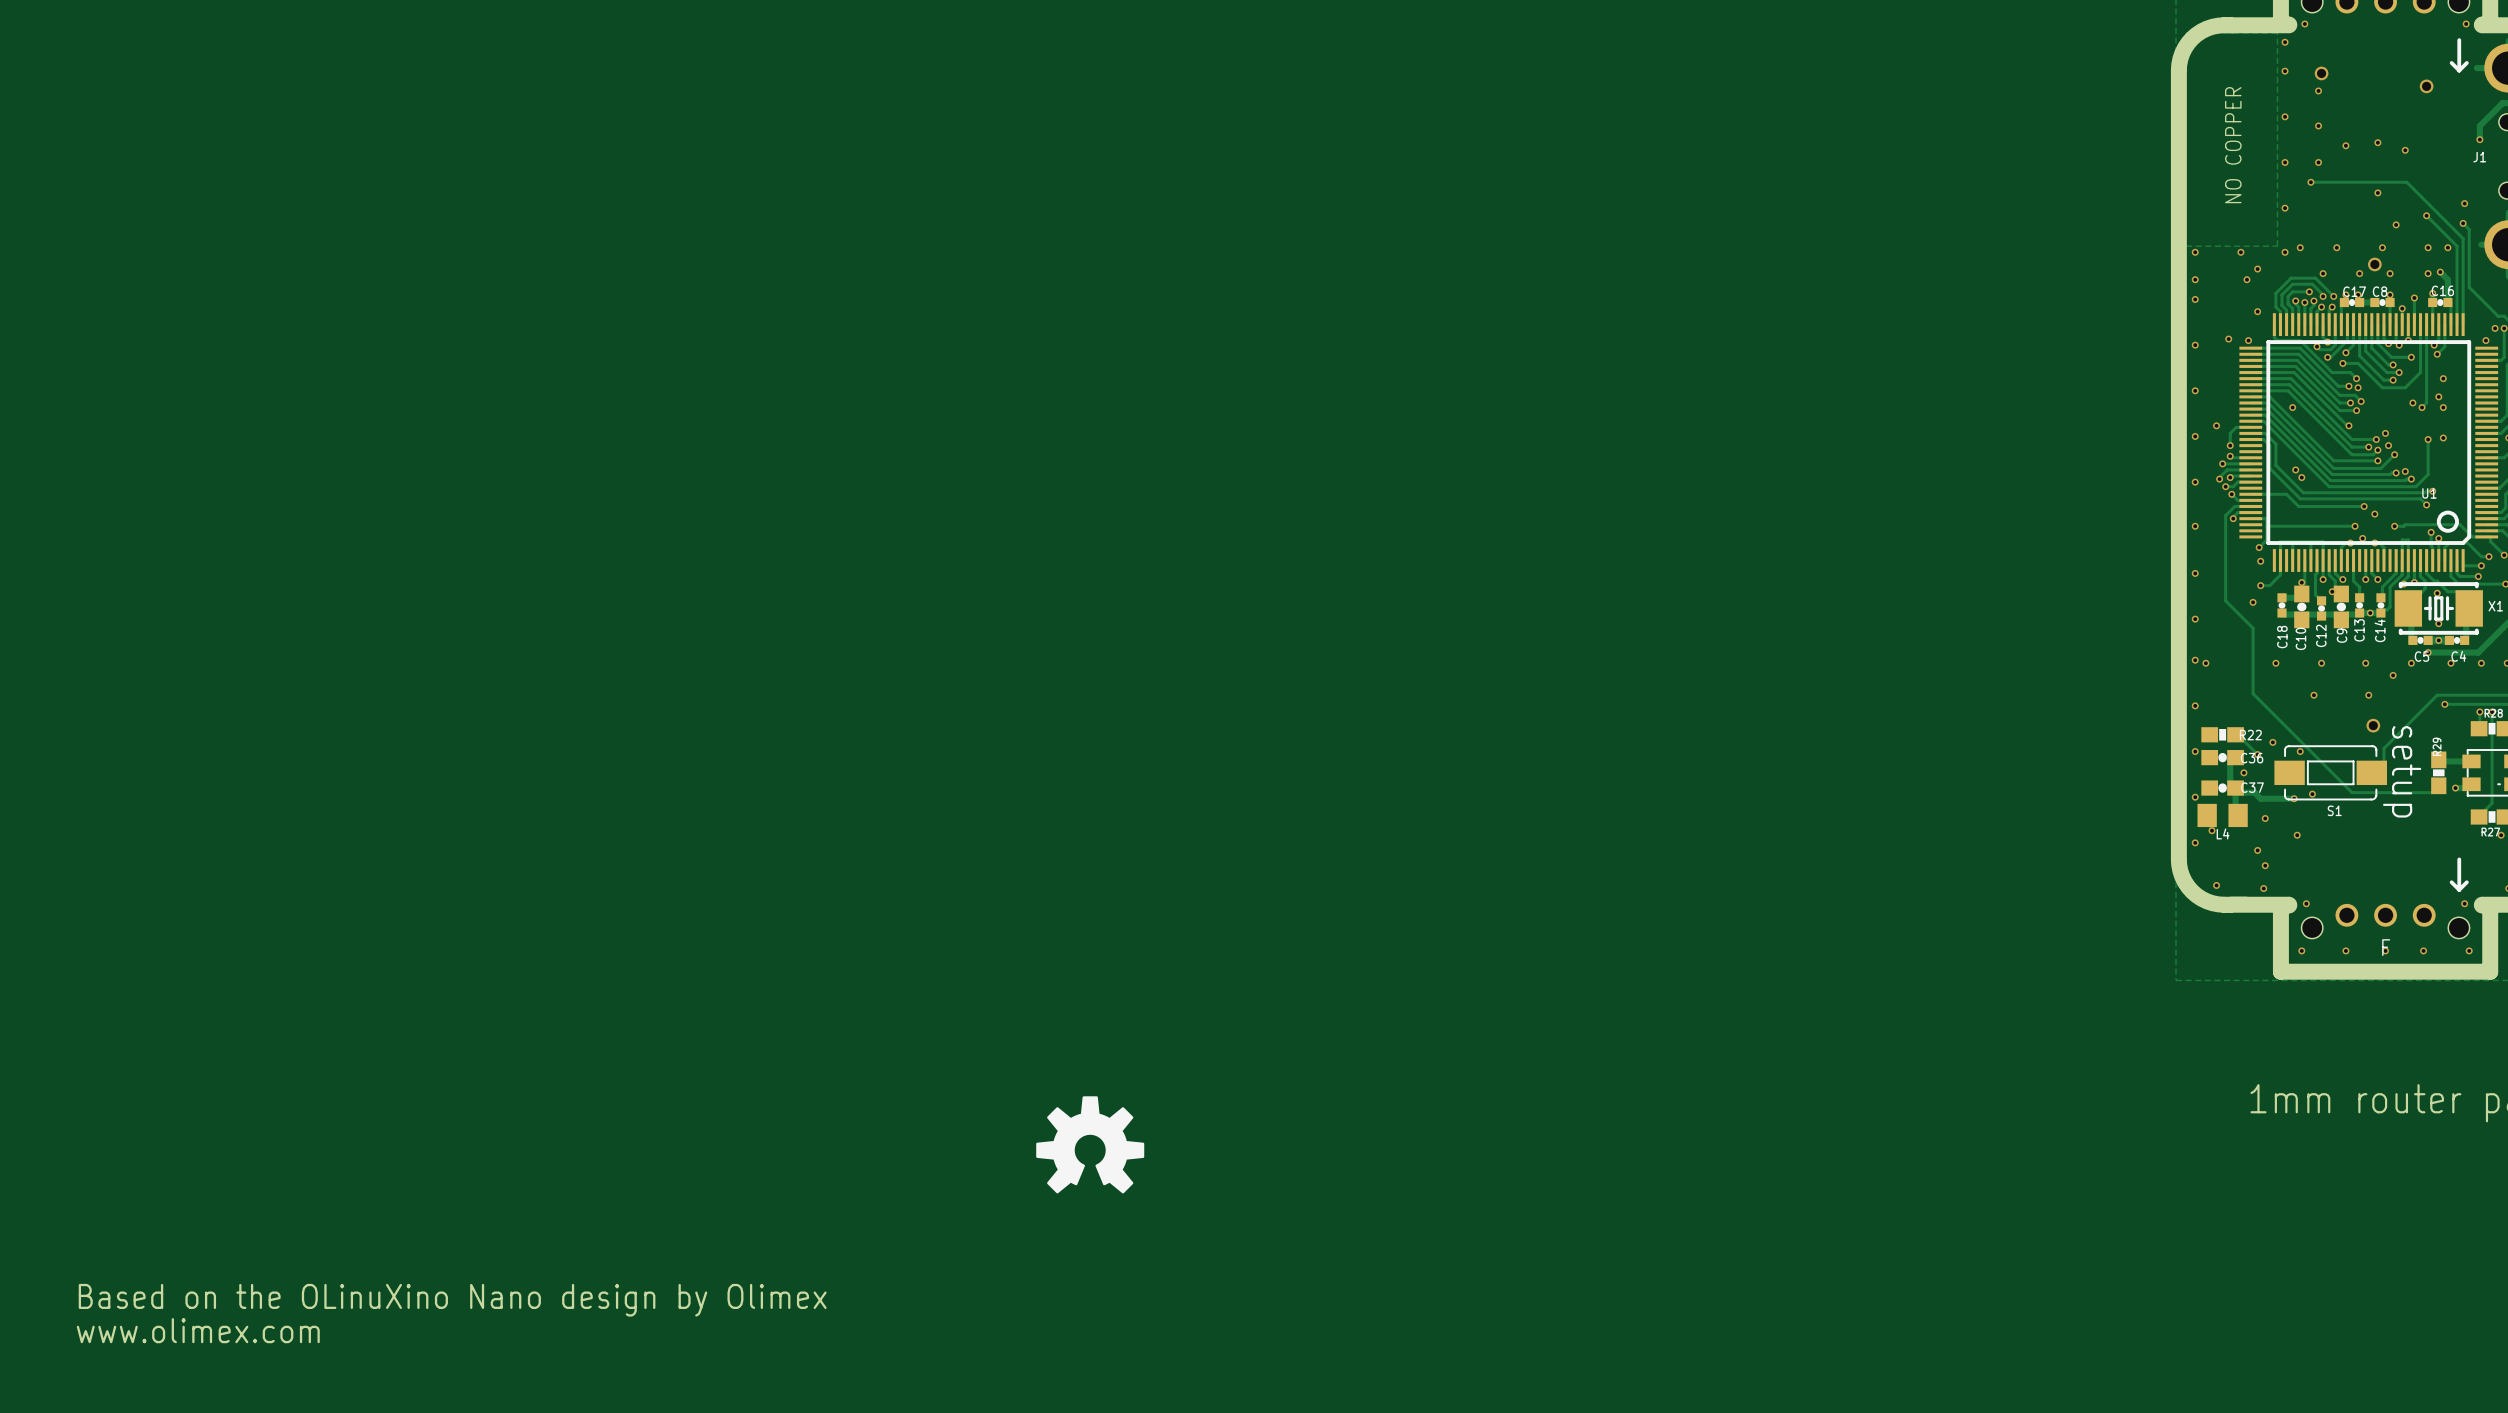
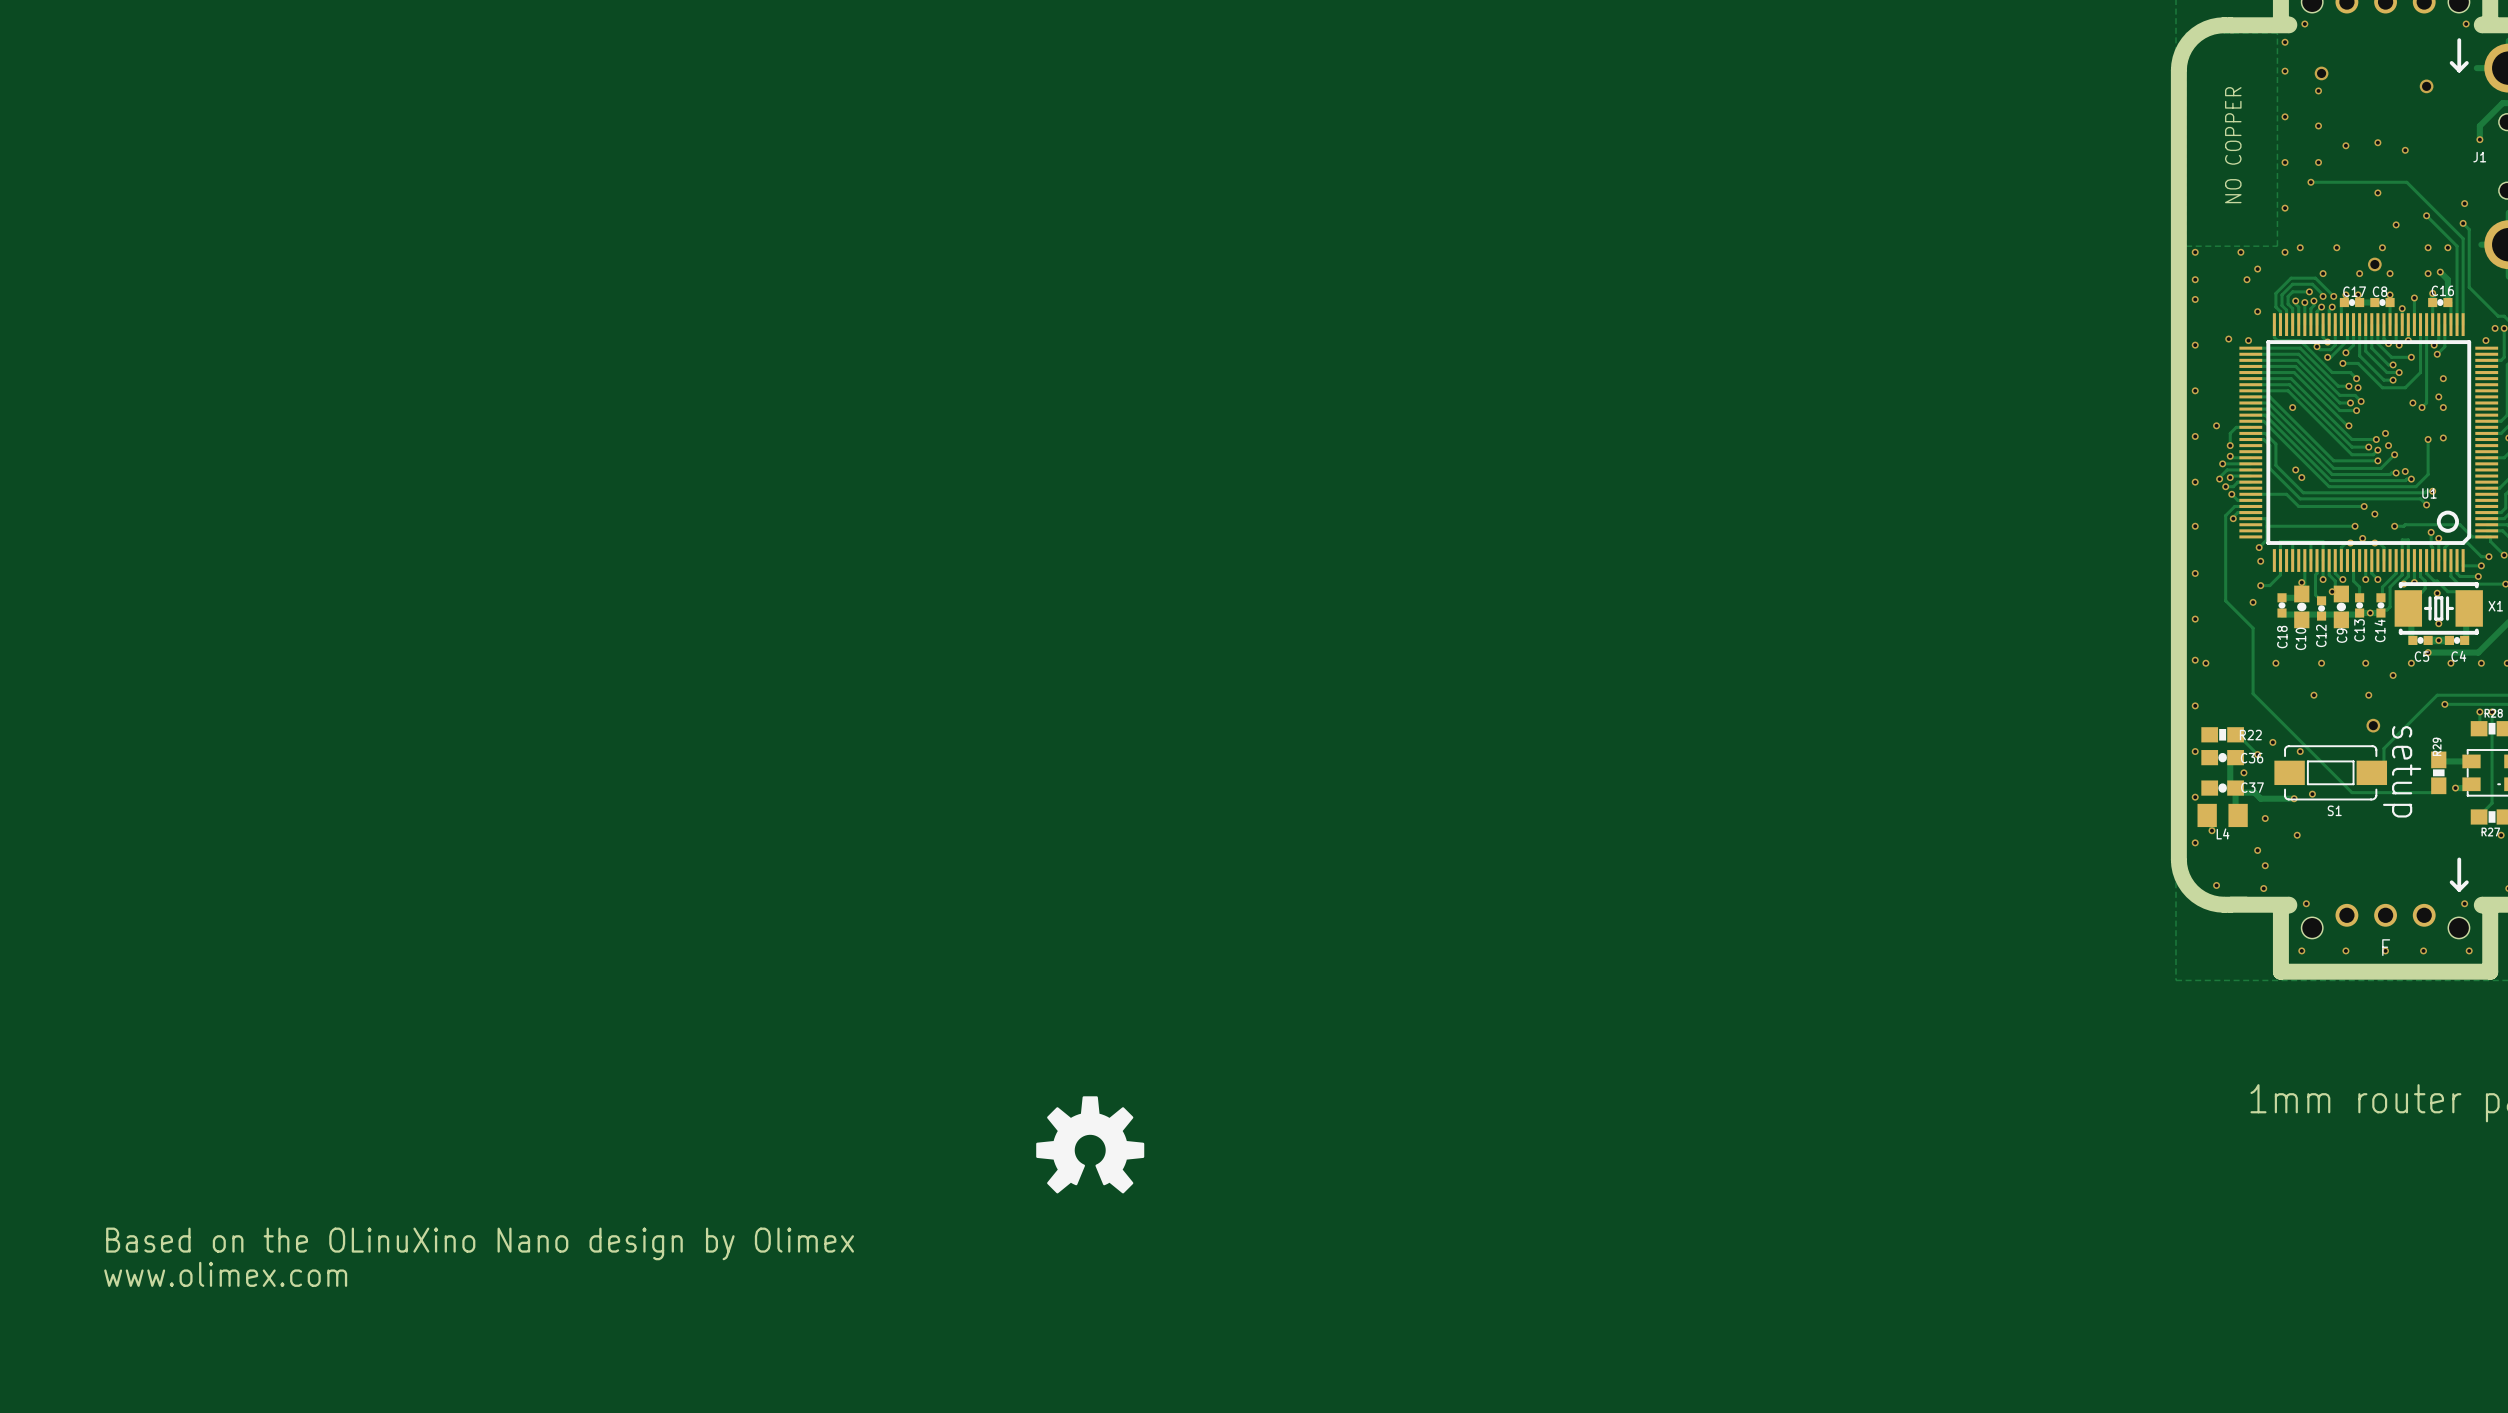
text position: Based on the OLinuXino Nano design by Olimex (452, 1300) -> Based on the OLinuXino Nano design by Olimex (480, 1243)
text position: www.olimex.com (198, 1330) -> www.olimex.com (225, 1274)

